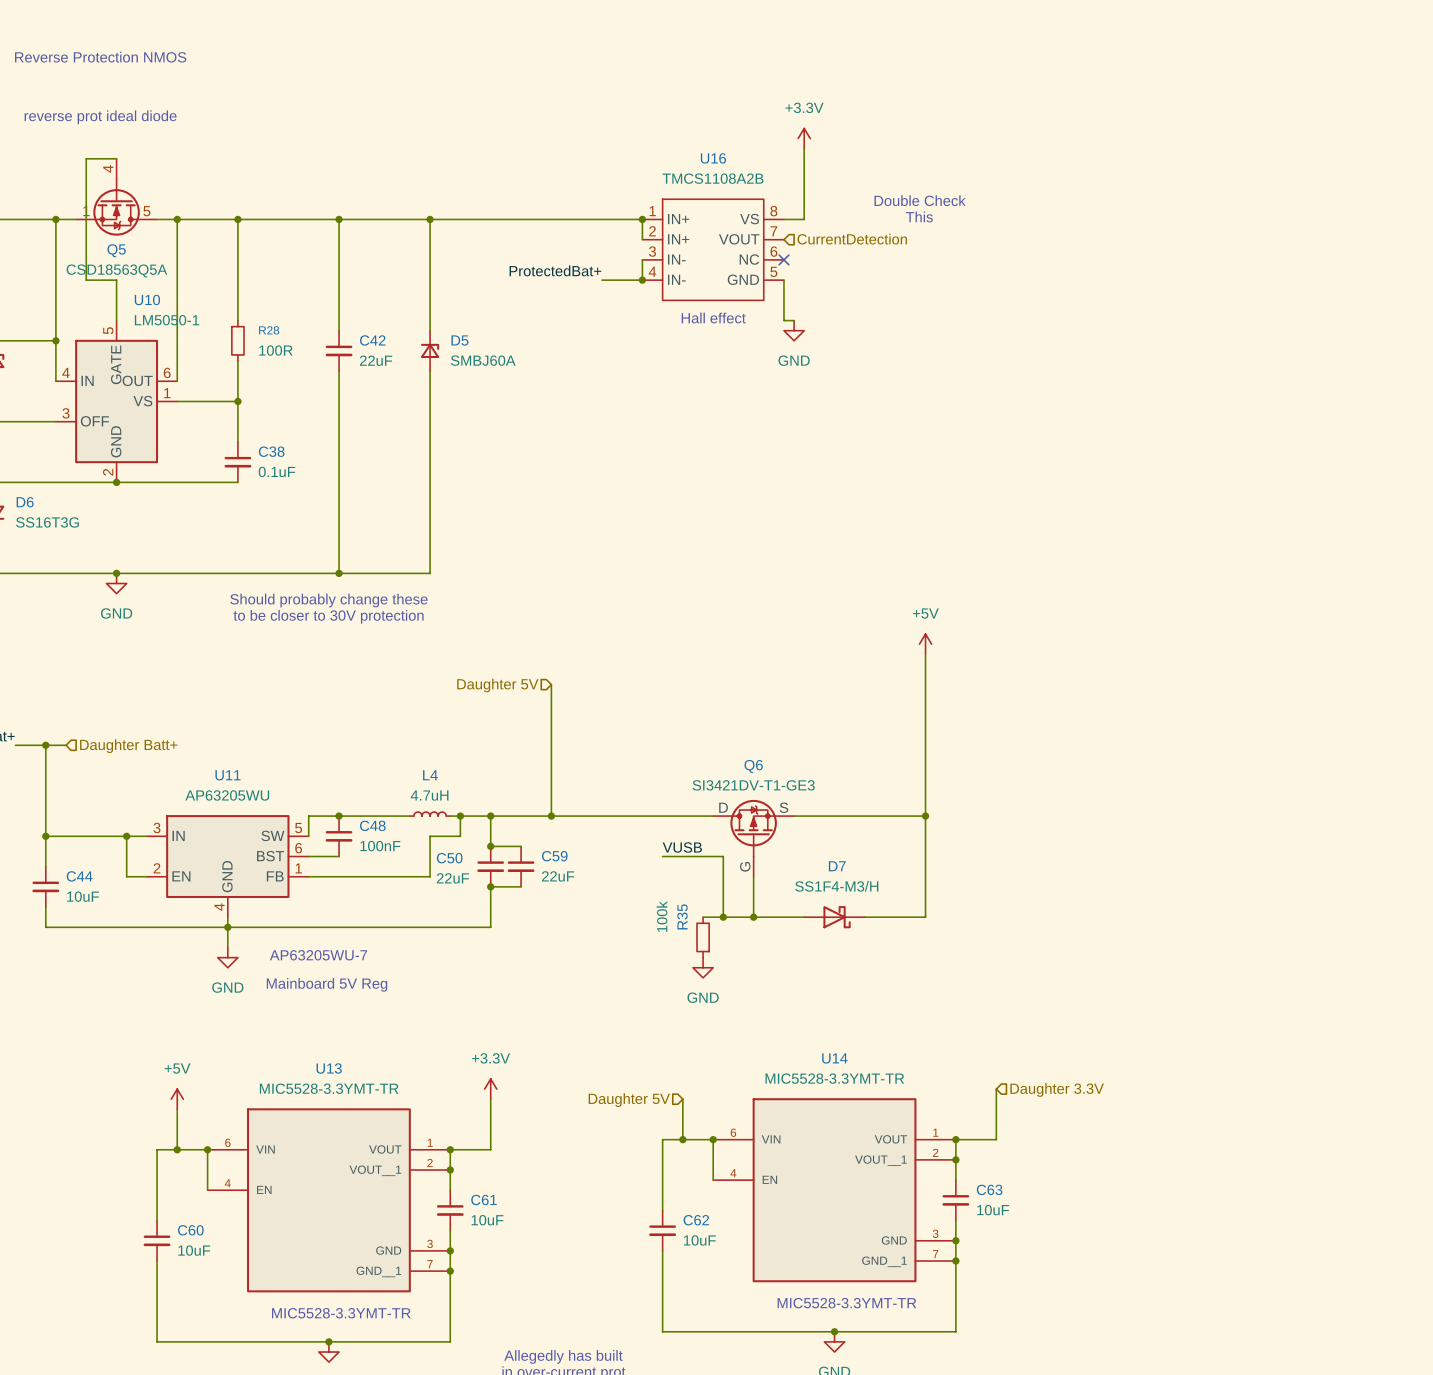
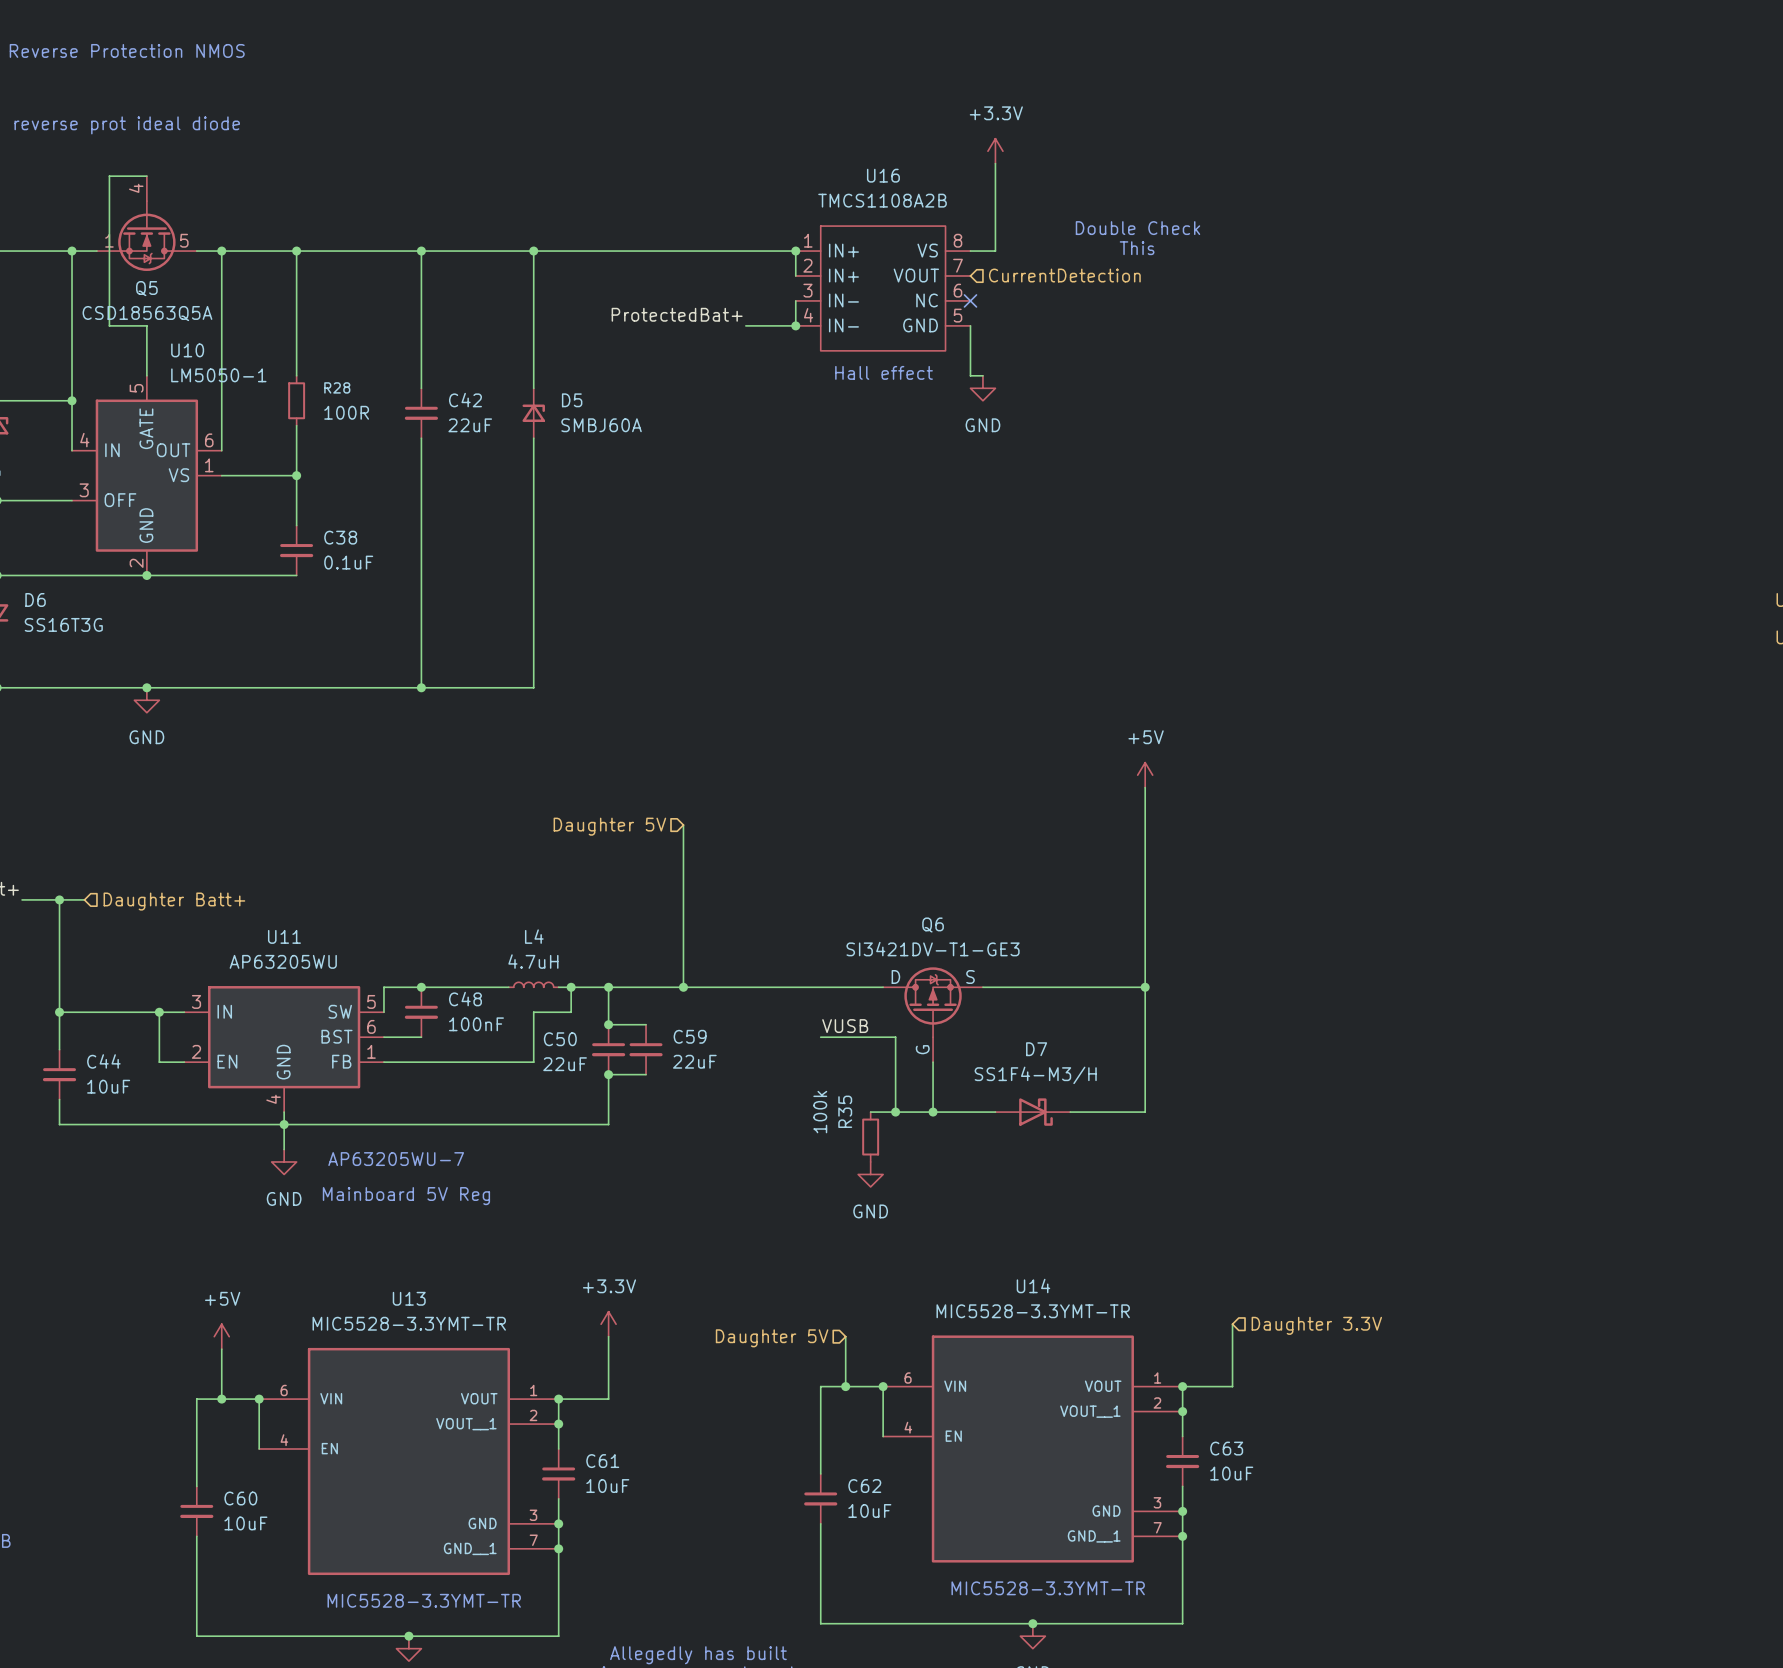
text: Should probably change these (328, 600) -> none
text: to be closer to 30V protection (328, 616) -> none

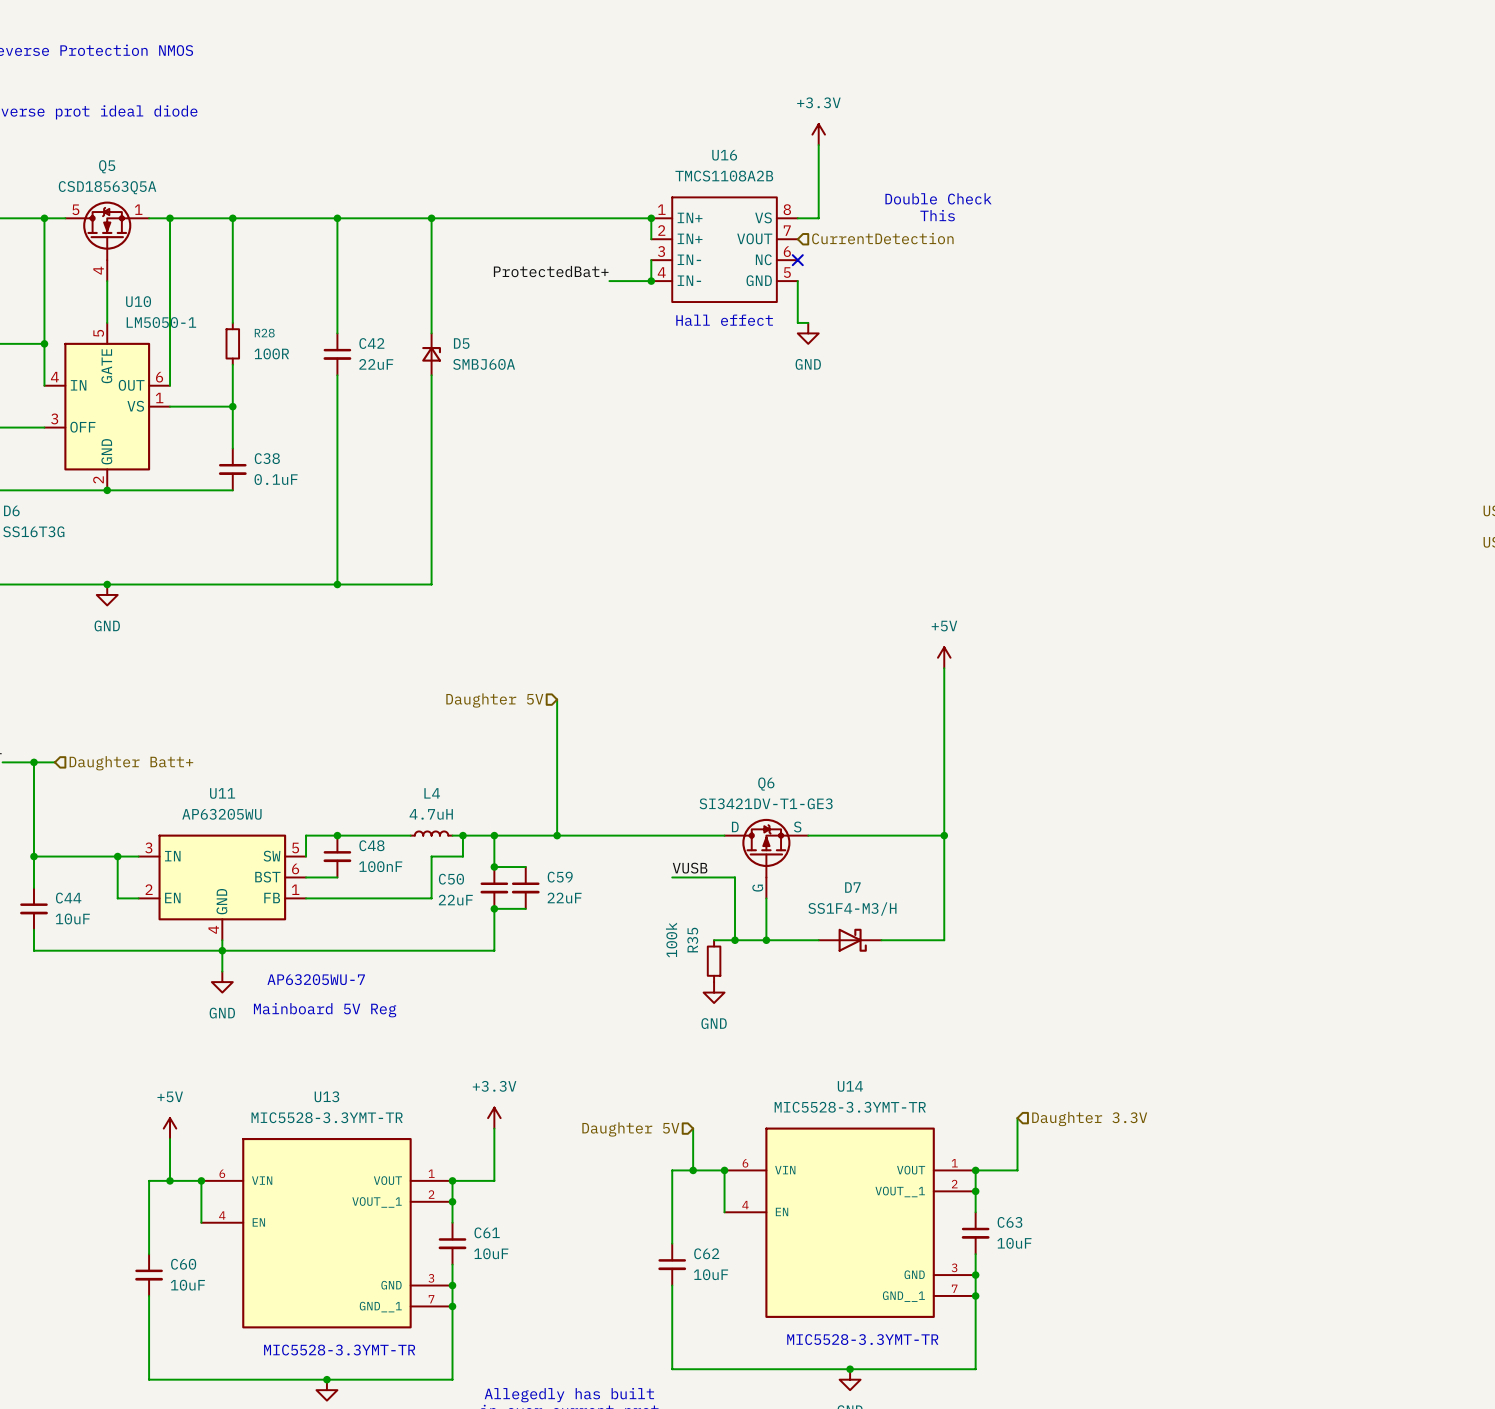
wire: (146, 176) (109, 176) (109, 325) (146, 325) -> none
Q5 rotation: 0° (146, 236) -> 180° (107, 230)
Q5 name position: Q5 (146, 288) -> Q5 (107, 166)
Q5 value position: CSD18563Q5A (147, 313) -> CSD18563Q5A (107, 187)

